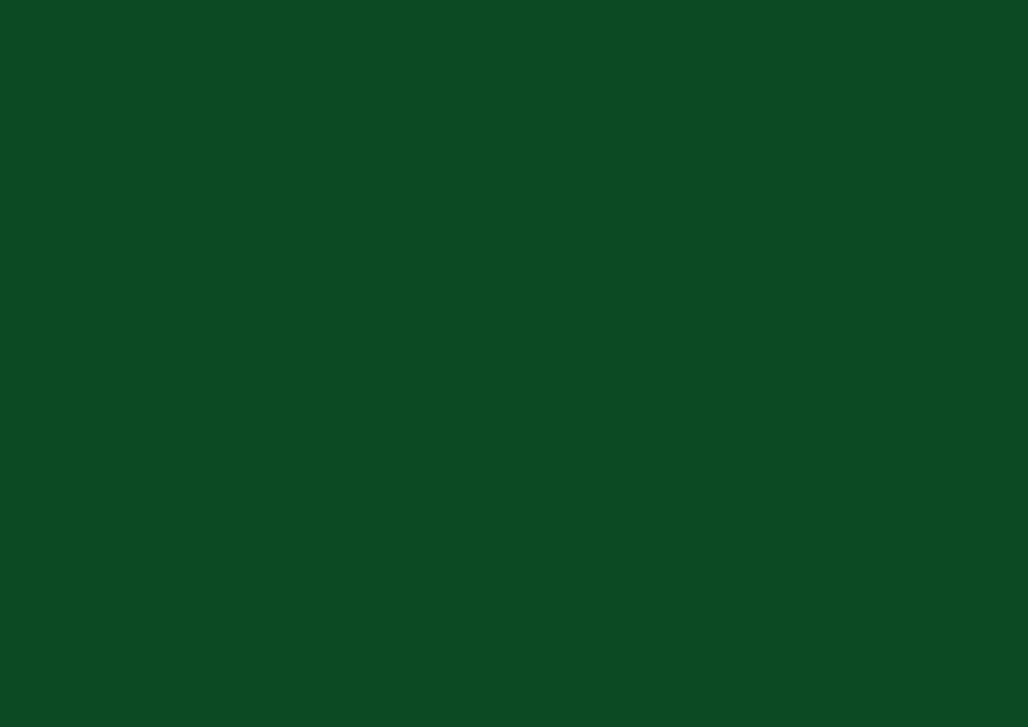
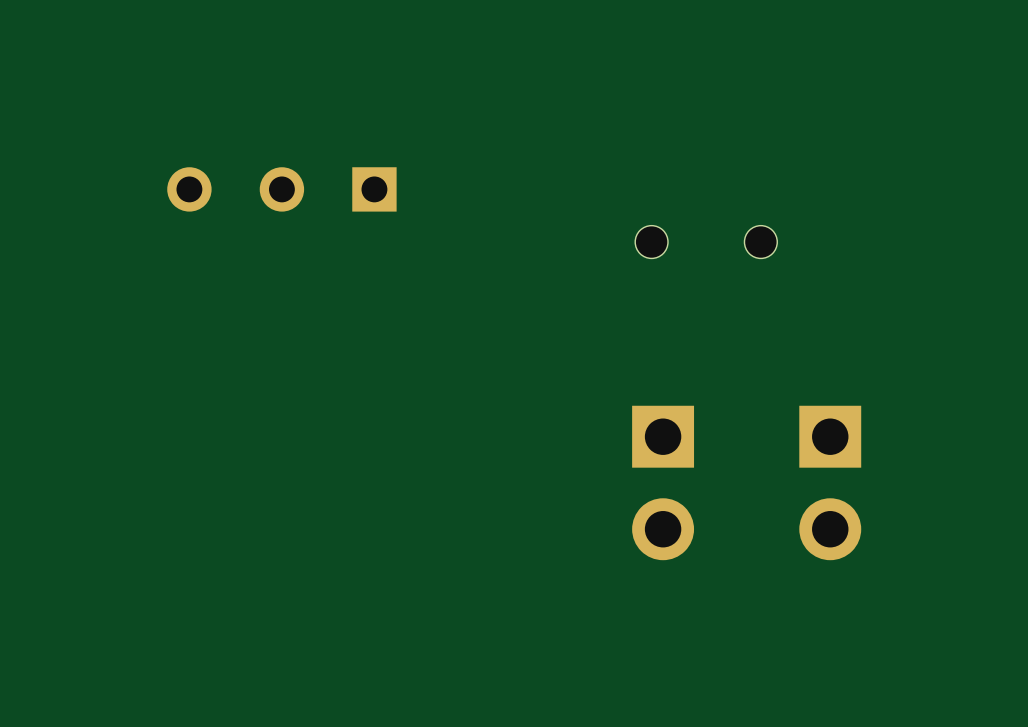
part: none -> (281, 189)
part: none -> (706, 242)
part: none -> (663, 482)
part: none -> (830, 482)

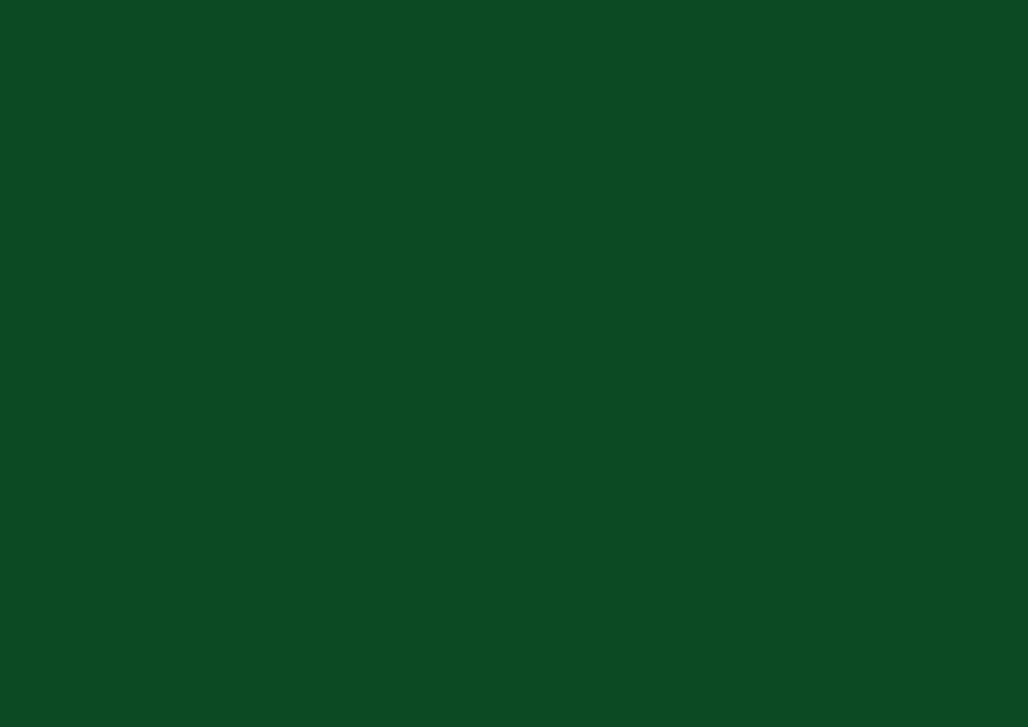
part: (281, 189) -> none
part: (706, 242) -> none
part: (663, 482) -> none
part: (830, 482) -> none

